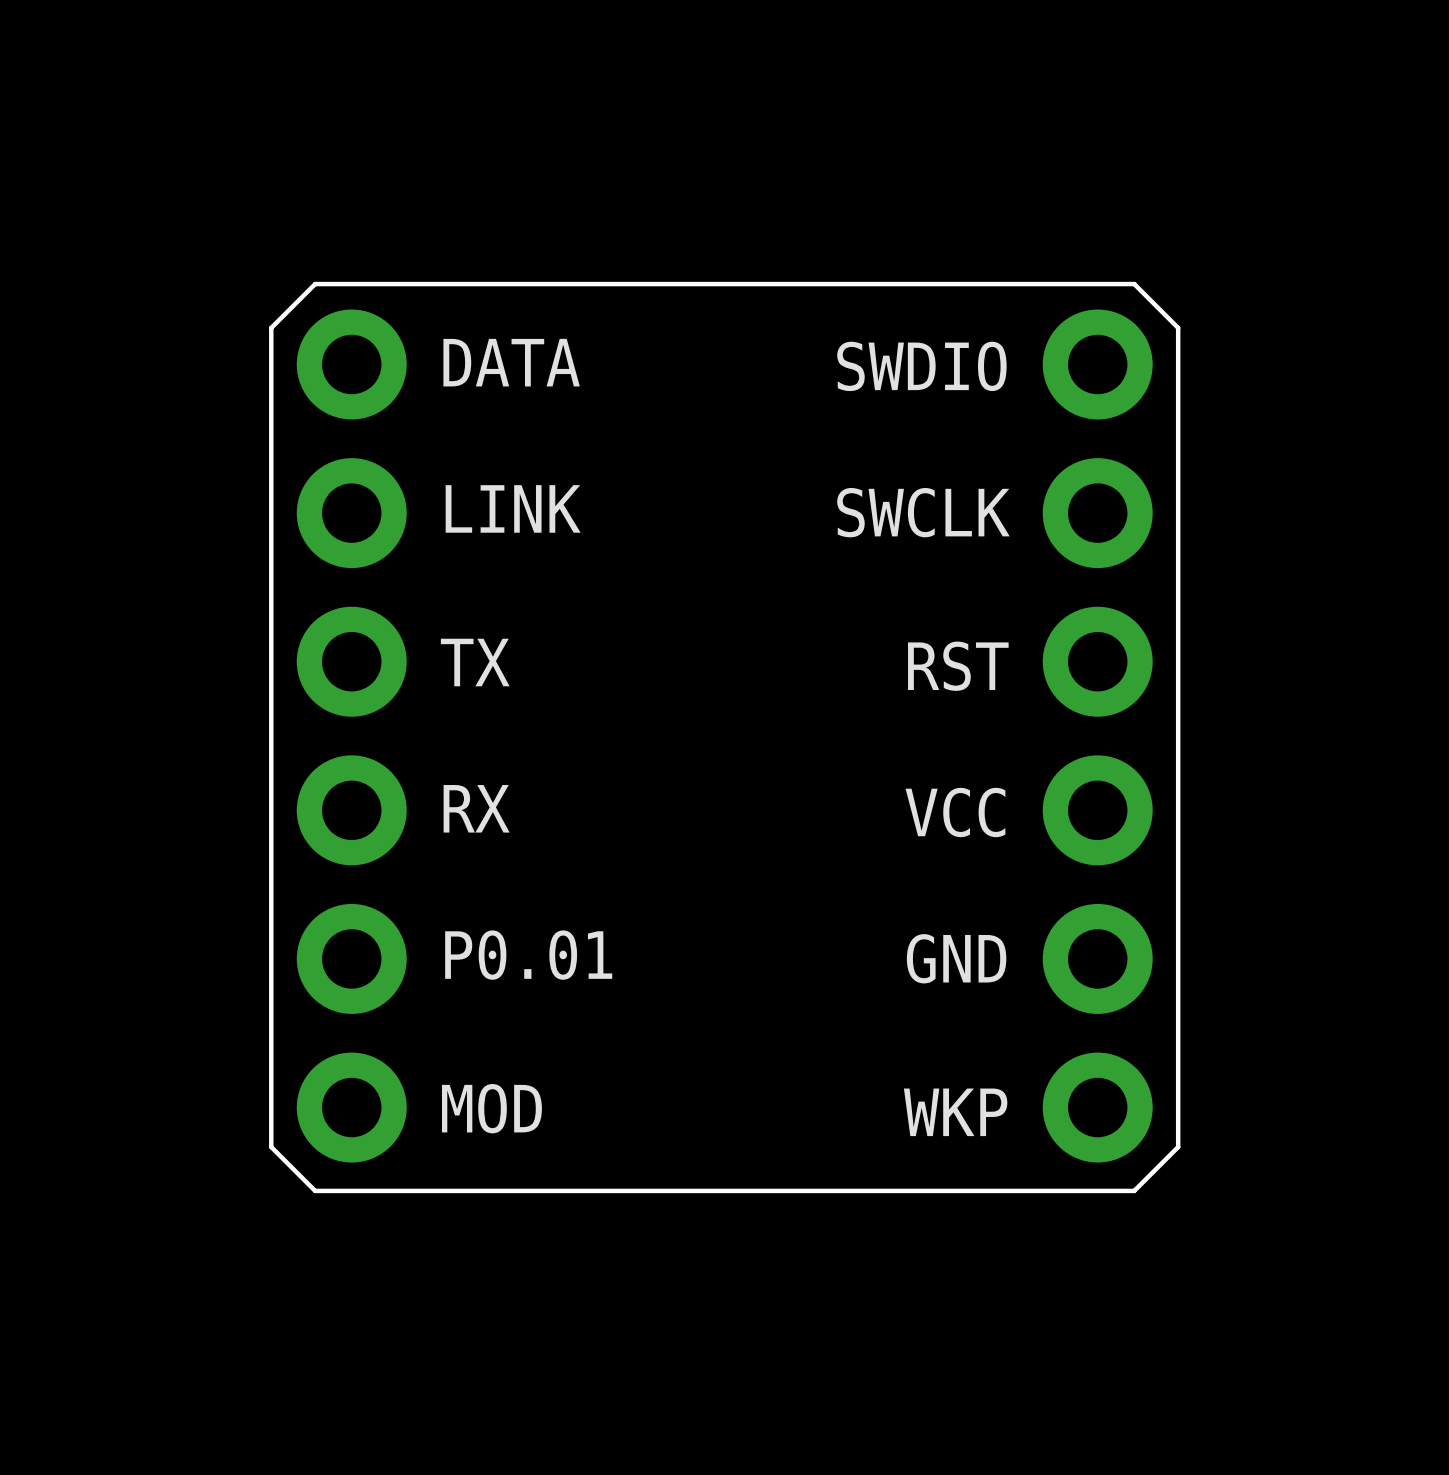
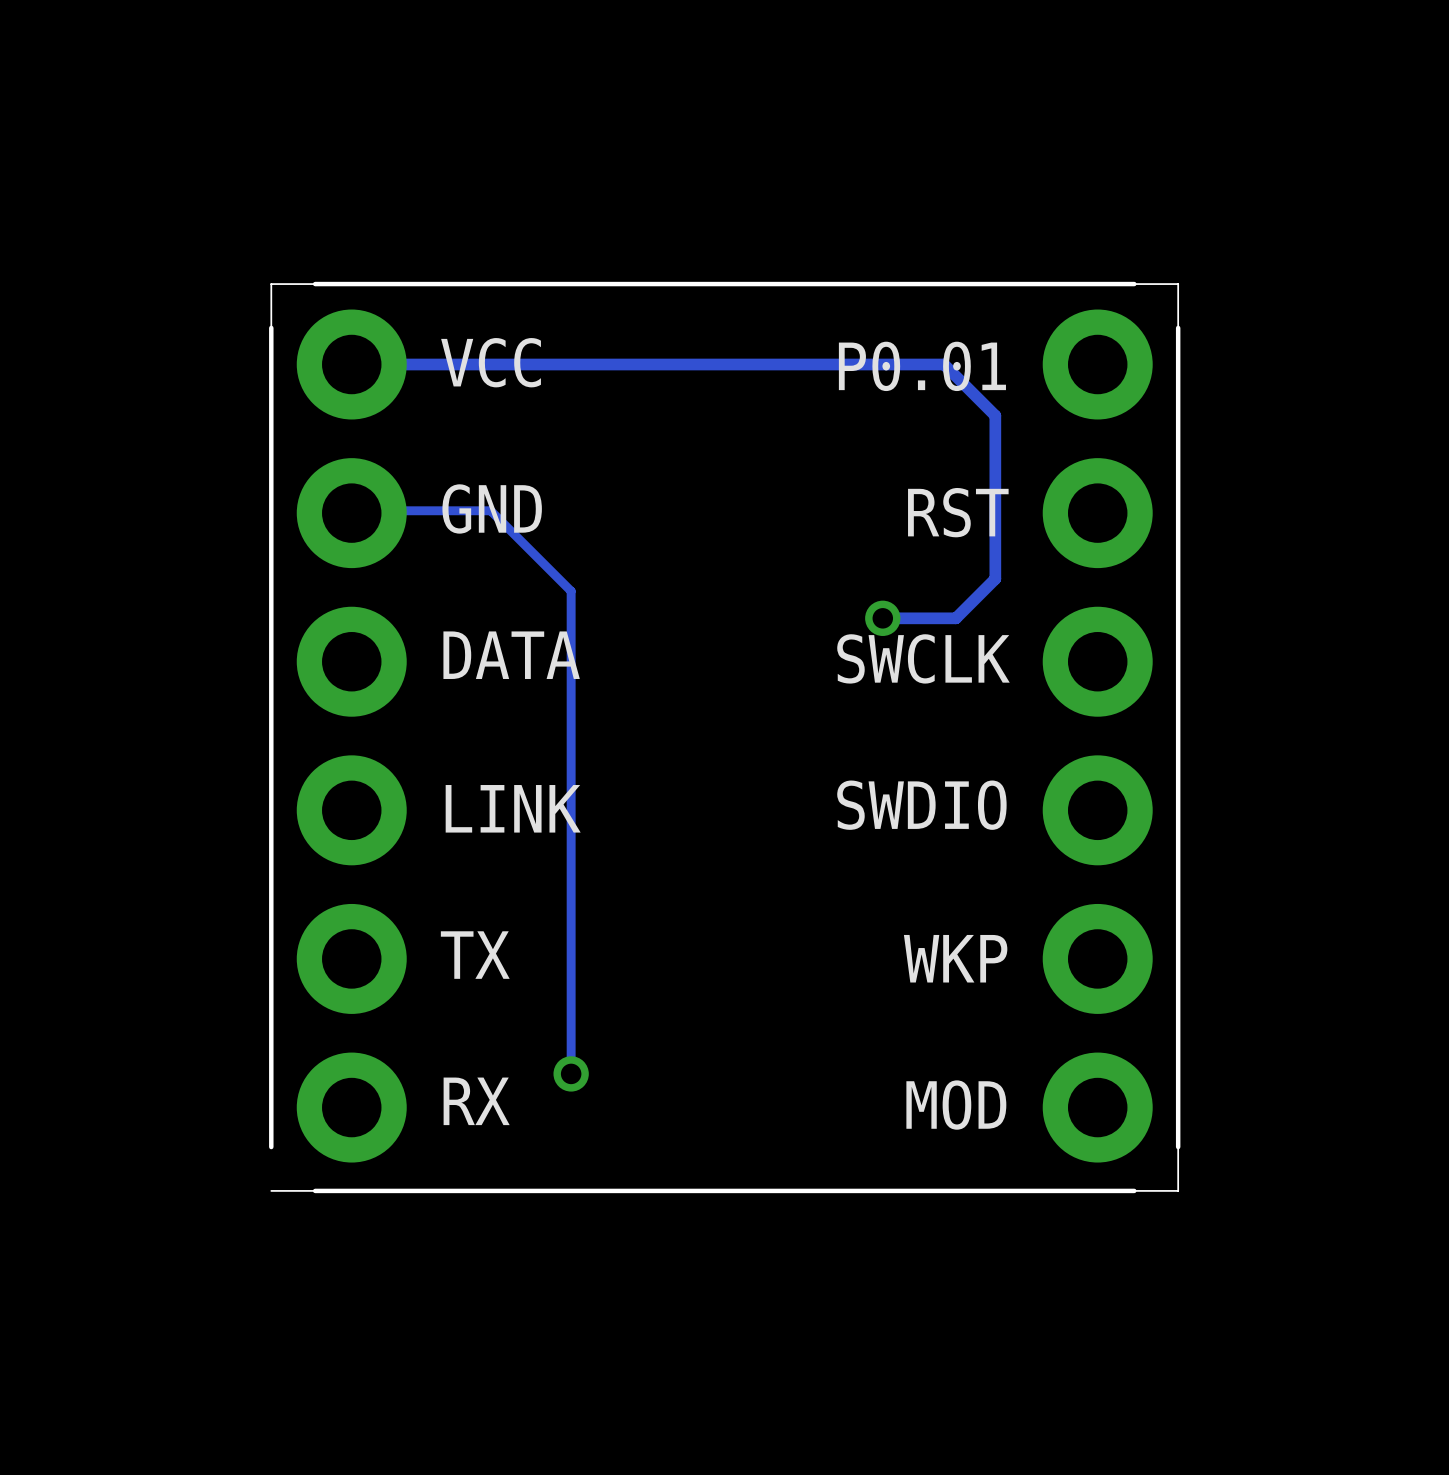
board edge: (315, 284) (271, 327) -> (315, 284) (271, 284) (271, 327)
board edge: (1134, 284) (1178, 327) -> (1134, 284) (1178, 284) (1178, 327)
text: DATA (511, 362) -> VCC (491, 362)
track: none -> (351, 364) (944, 364) (995, 415) (995, 578) (955, 618) (882, 618)
text: SWDIO (921, 366) -> P0.01 (922, 366)
text: LINK (513, 508) -> GND (492, 508)
text: SWCLK (923, 512) -> RST (958, 512)
track: none -> (351, 513) (354, 510) (490, 510) (571, 591) (571, 1073)
via: none -> (882, 618)
text: TX (475, 662) -> DATA (511, 655)
text: RST (958, 666) -> SWCLK (923, 658)
text: RX (476, 808) -> LINK (513, 808)
text: VCC (955, 812) -> SWDIO (921, 805)
text: P0.01 (528, 955) -> TX (475, 955)
text: GND (956, 958) -> WKP (955, 958)
via: none -> (571, 1073)
text: none -> RX (476, 1101)
text position: MOD (491, 1108) -> MOD (956, 1105)
text: WKP (955, 1112) -> none
board edge: (271, 1147) (315, 1190) -> (271, 1190) (315, 1190)
board edge: (1178, 1147) (1134, 1190) -> (1178, 1147) (1178, 1190) (1134, 1190)

